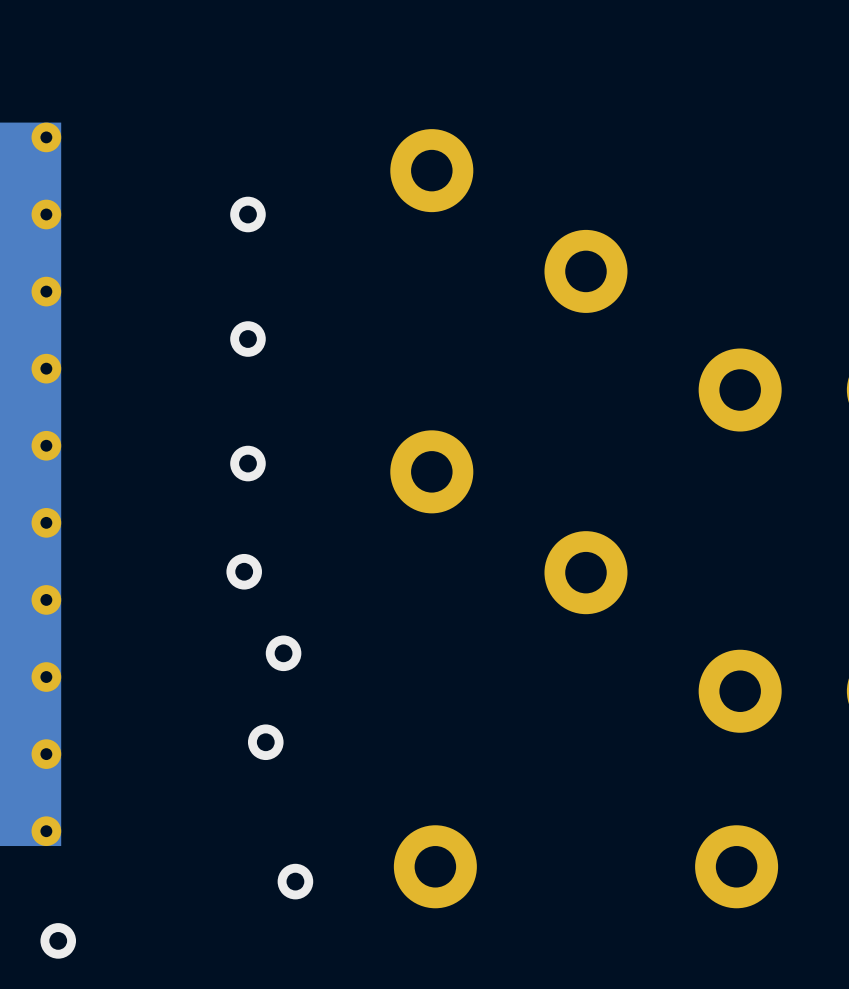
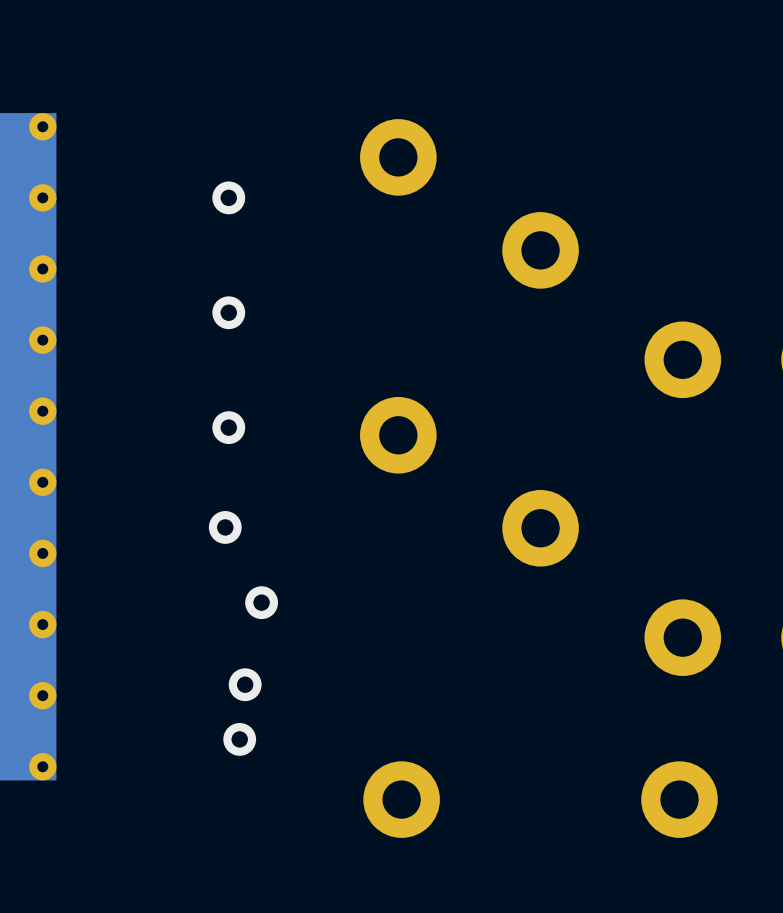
via position: (295, 881) -> (239, 739)
via: (58, 940) -> none

